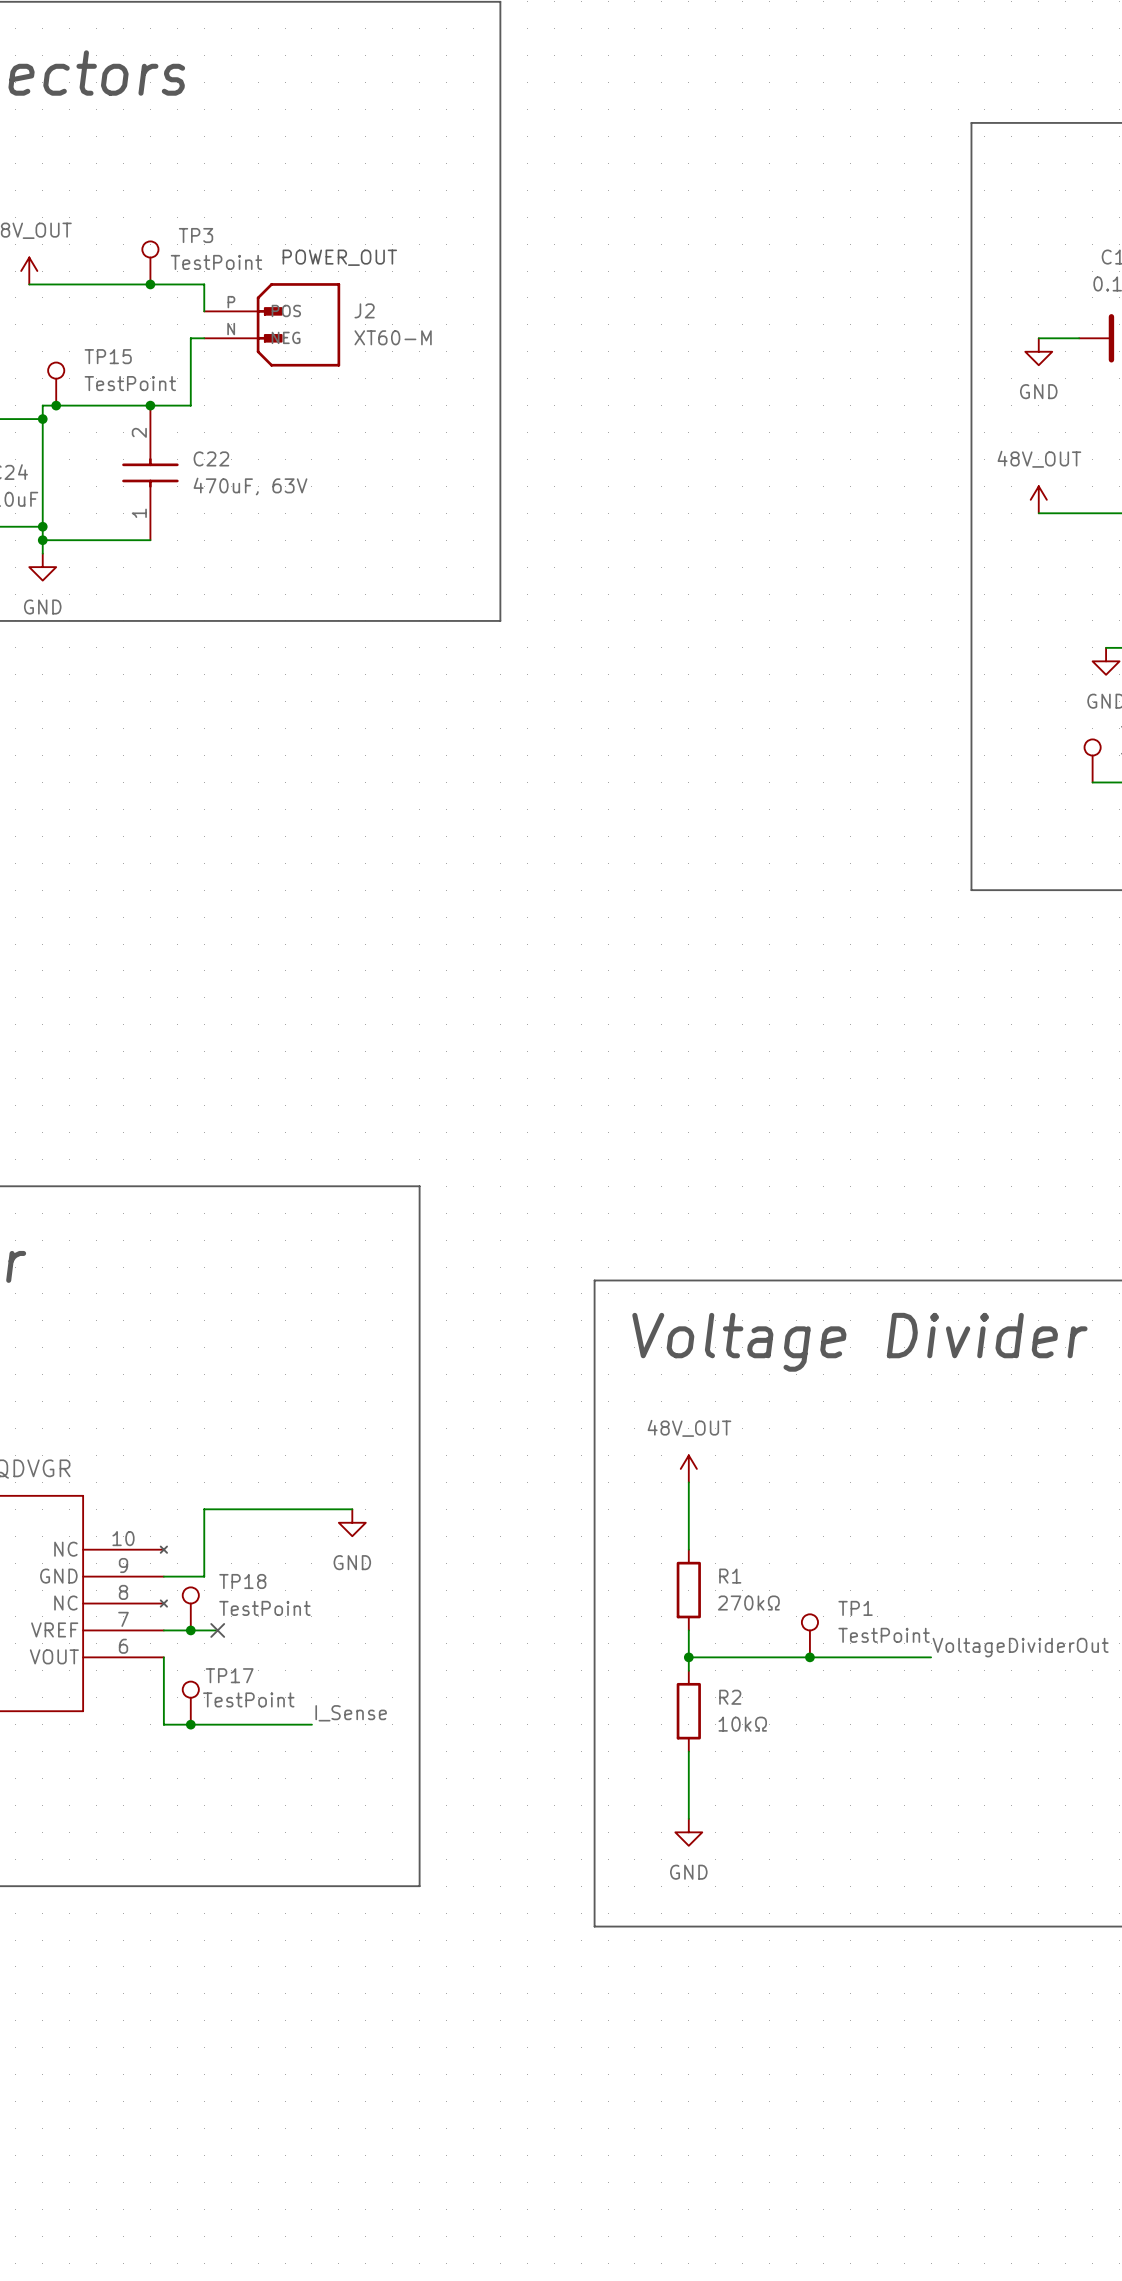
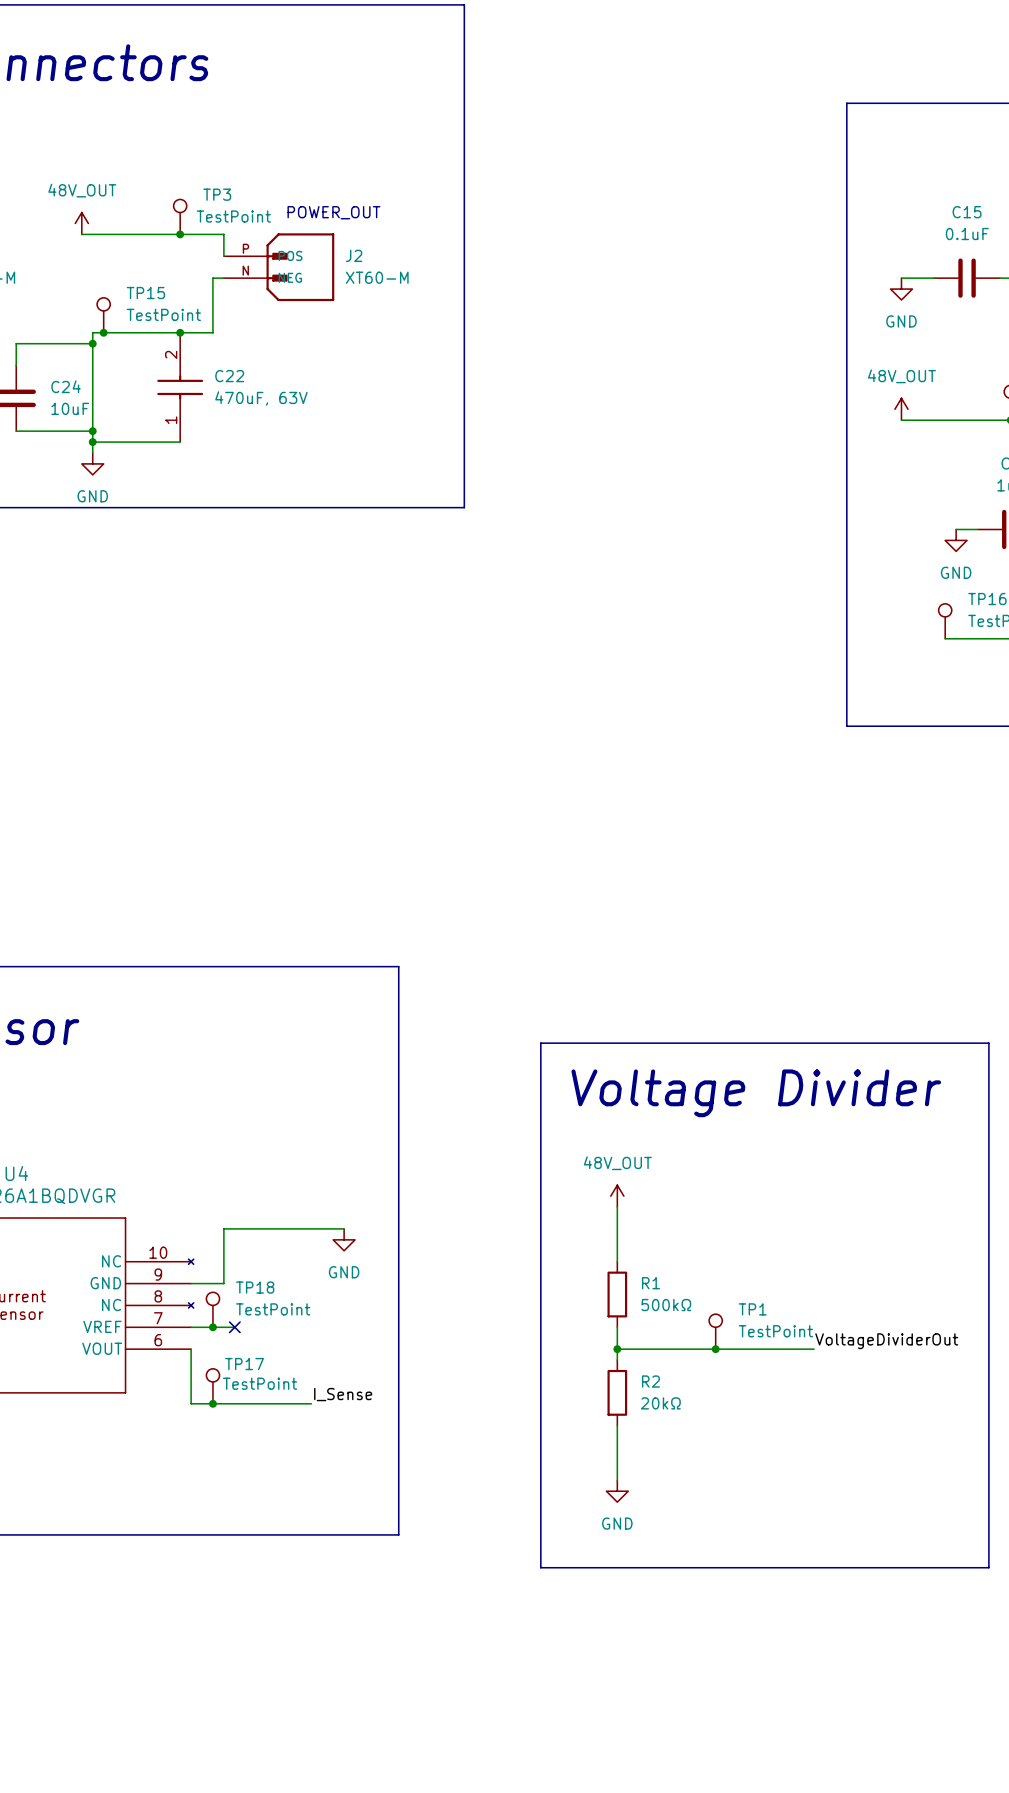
R1 value: 270kΩ (748, 1603) -> 500kΩ (666, 1305)
R2 value: 10kΩ (742, 1724) -> 20kΩ (660, 1403)

